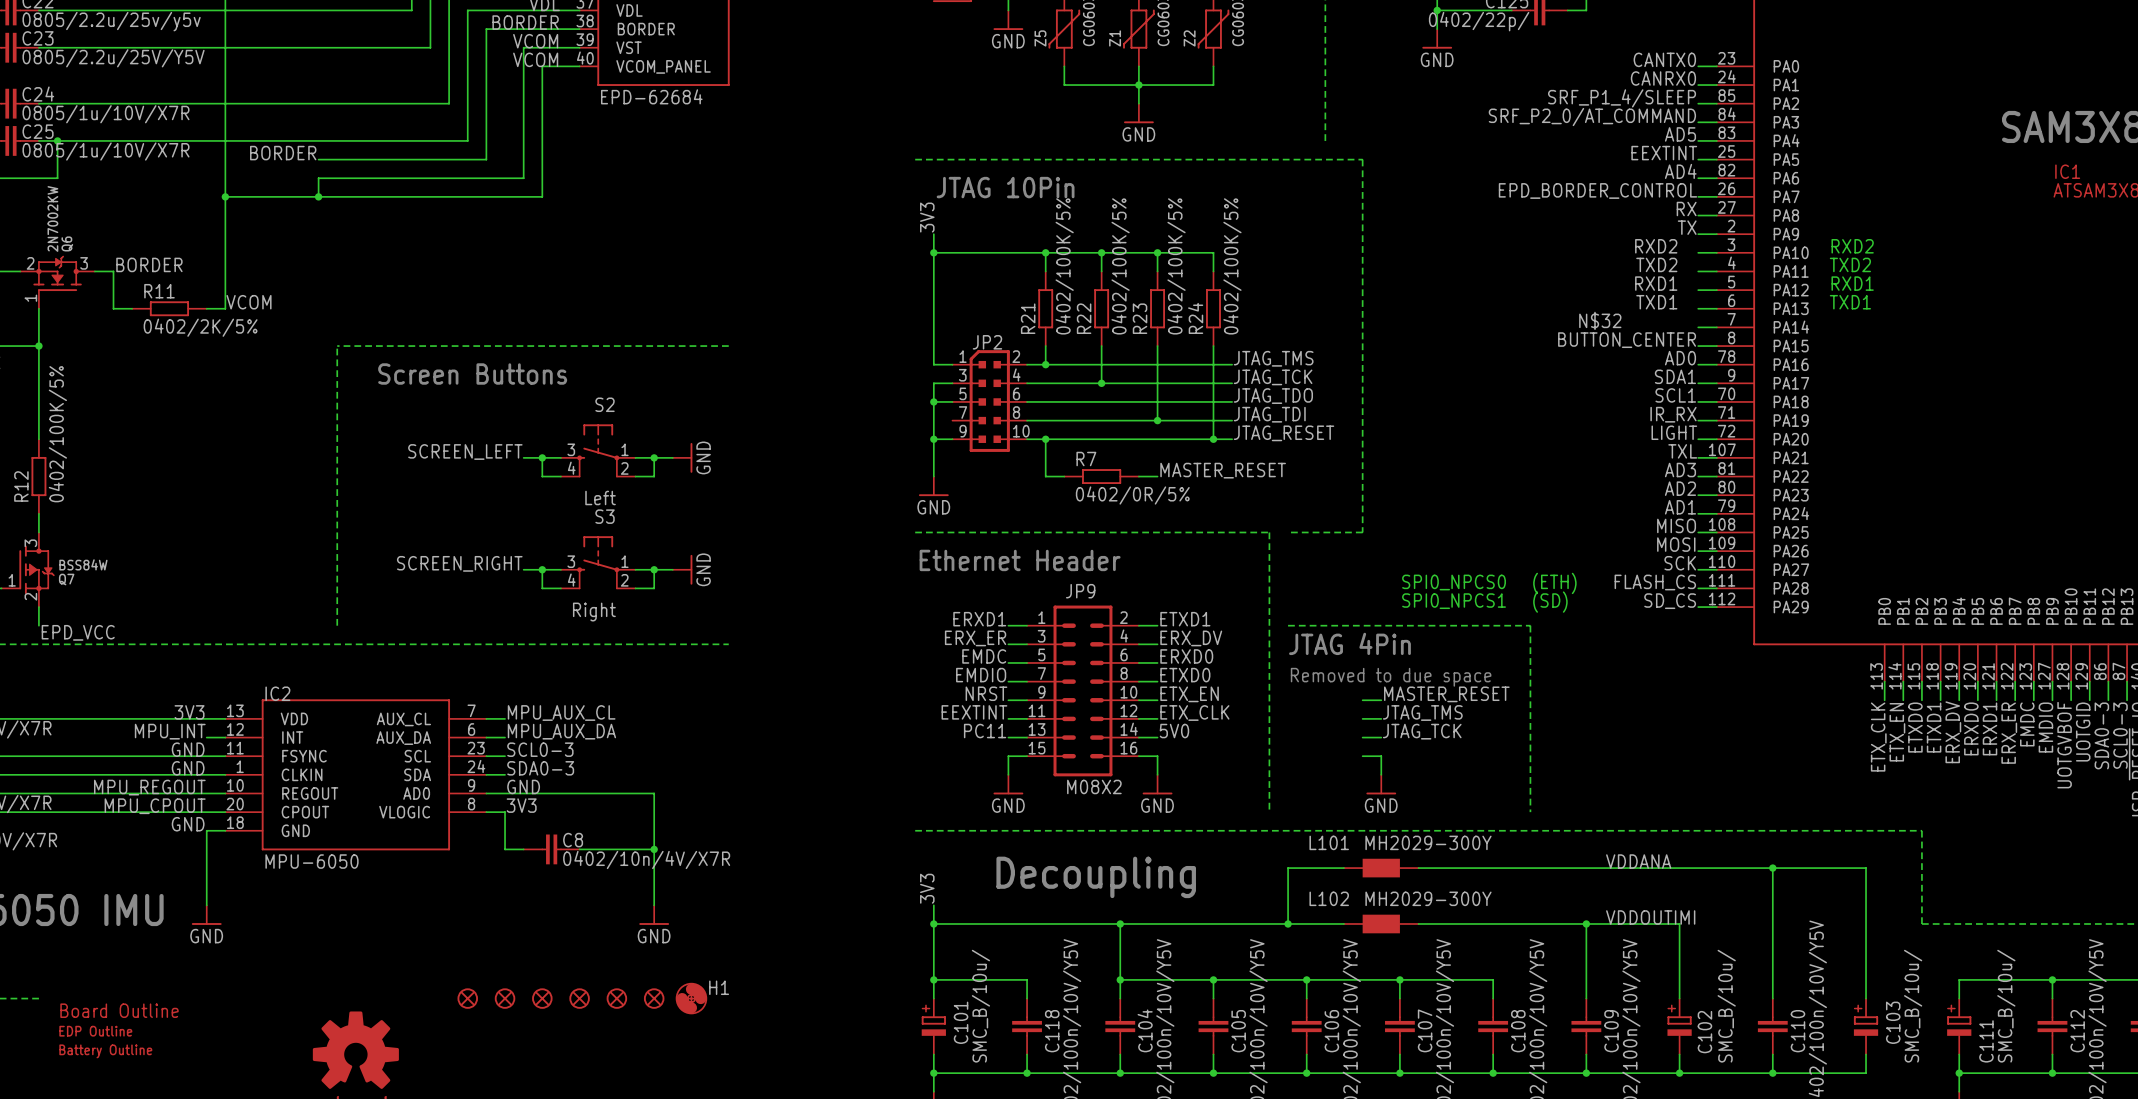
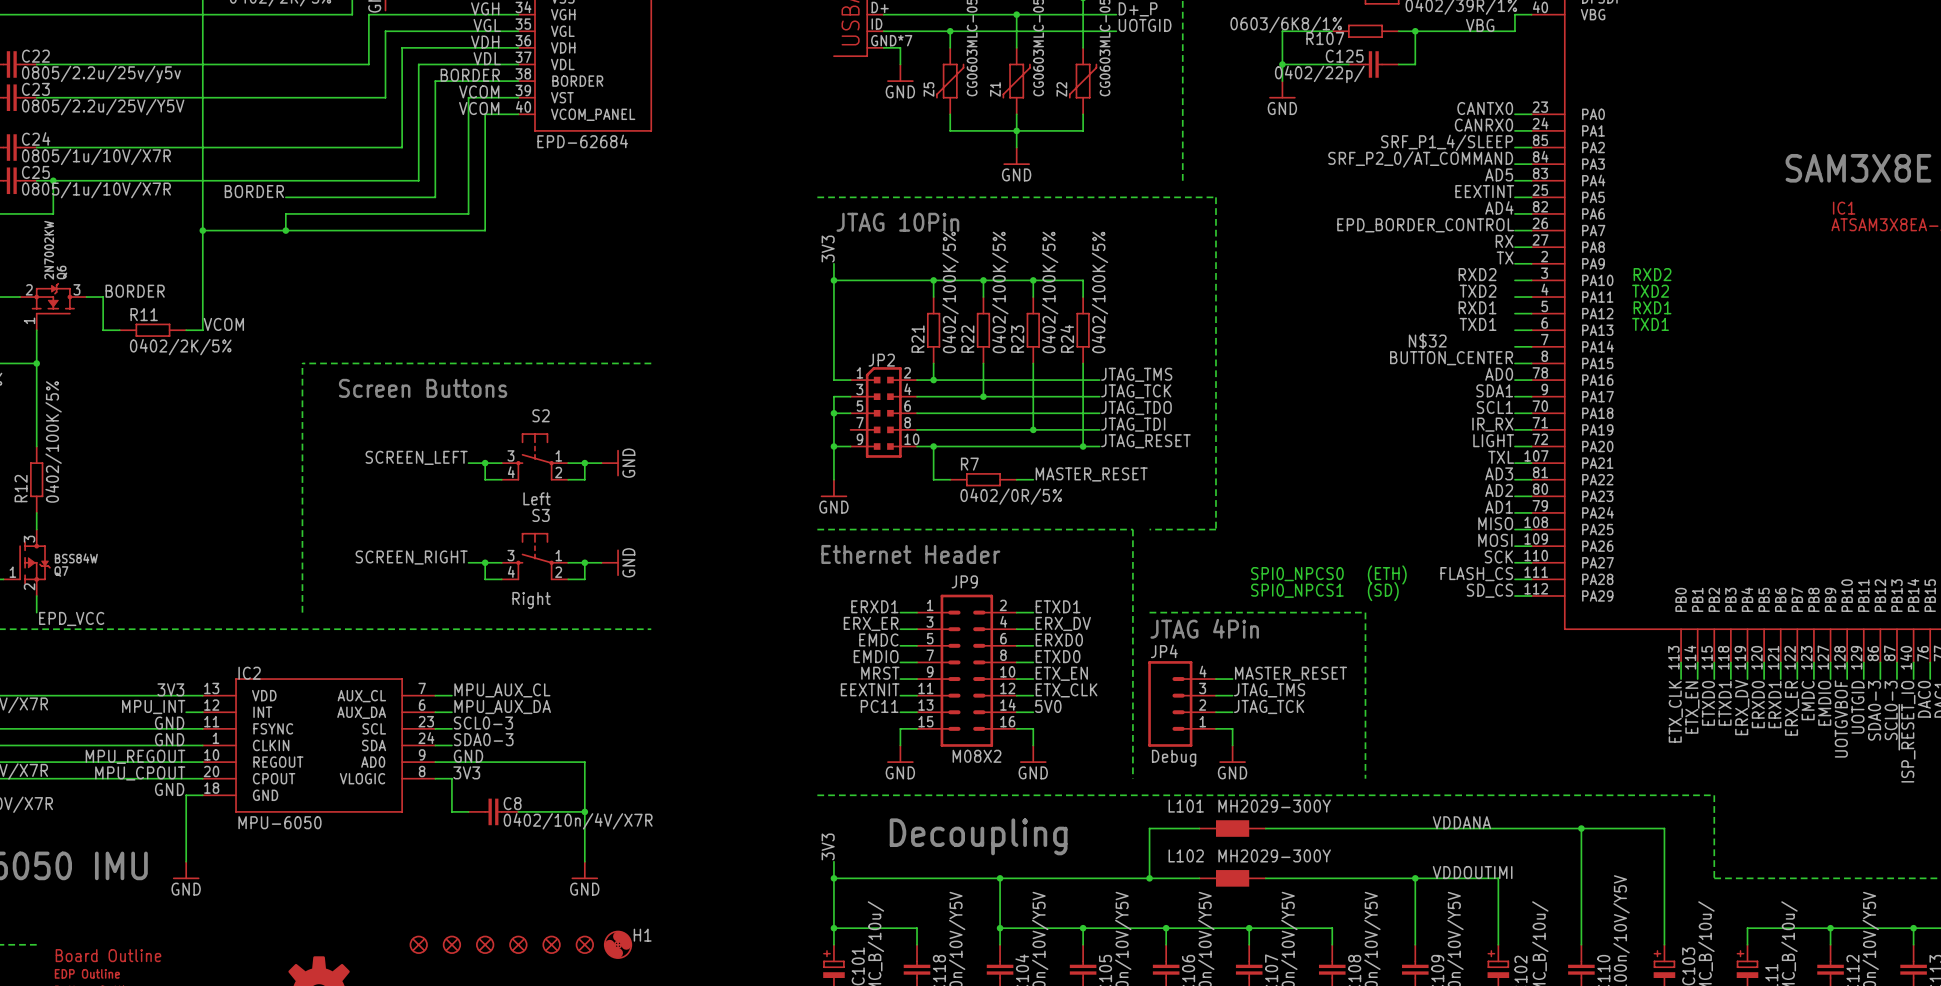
text: Removed to due space (1391, 677) -> none
label: NRST (986, 693) -> MRST (880, 673)
label: EEXTINT (974, 712) -> EEXTNIT (870, 689)
JP4: none -> Debug (1182, 703)

